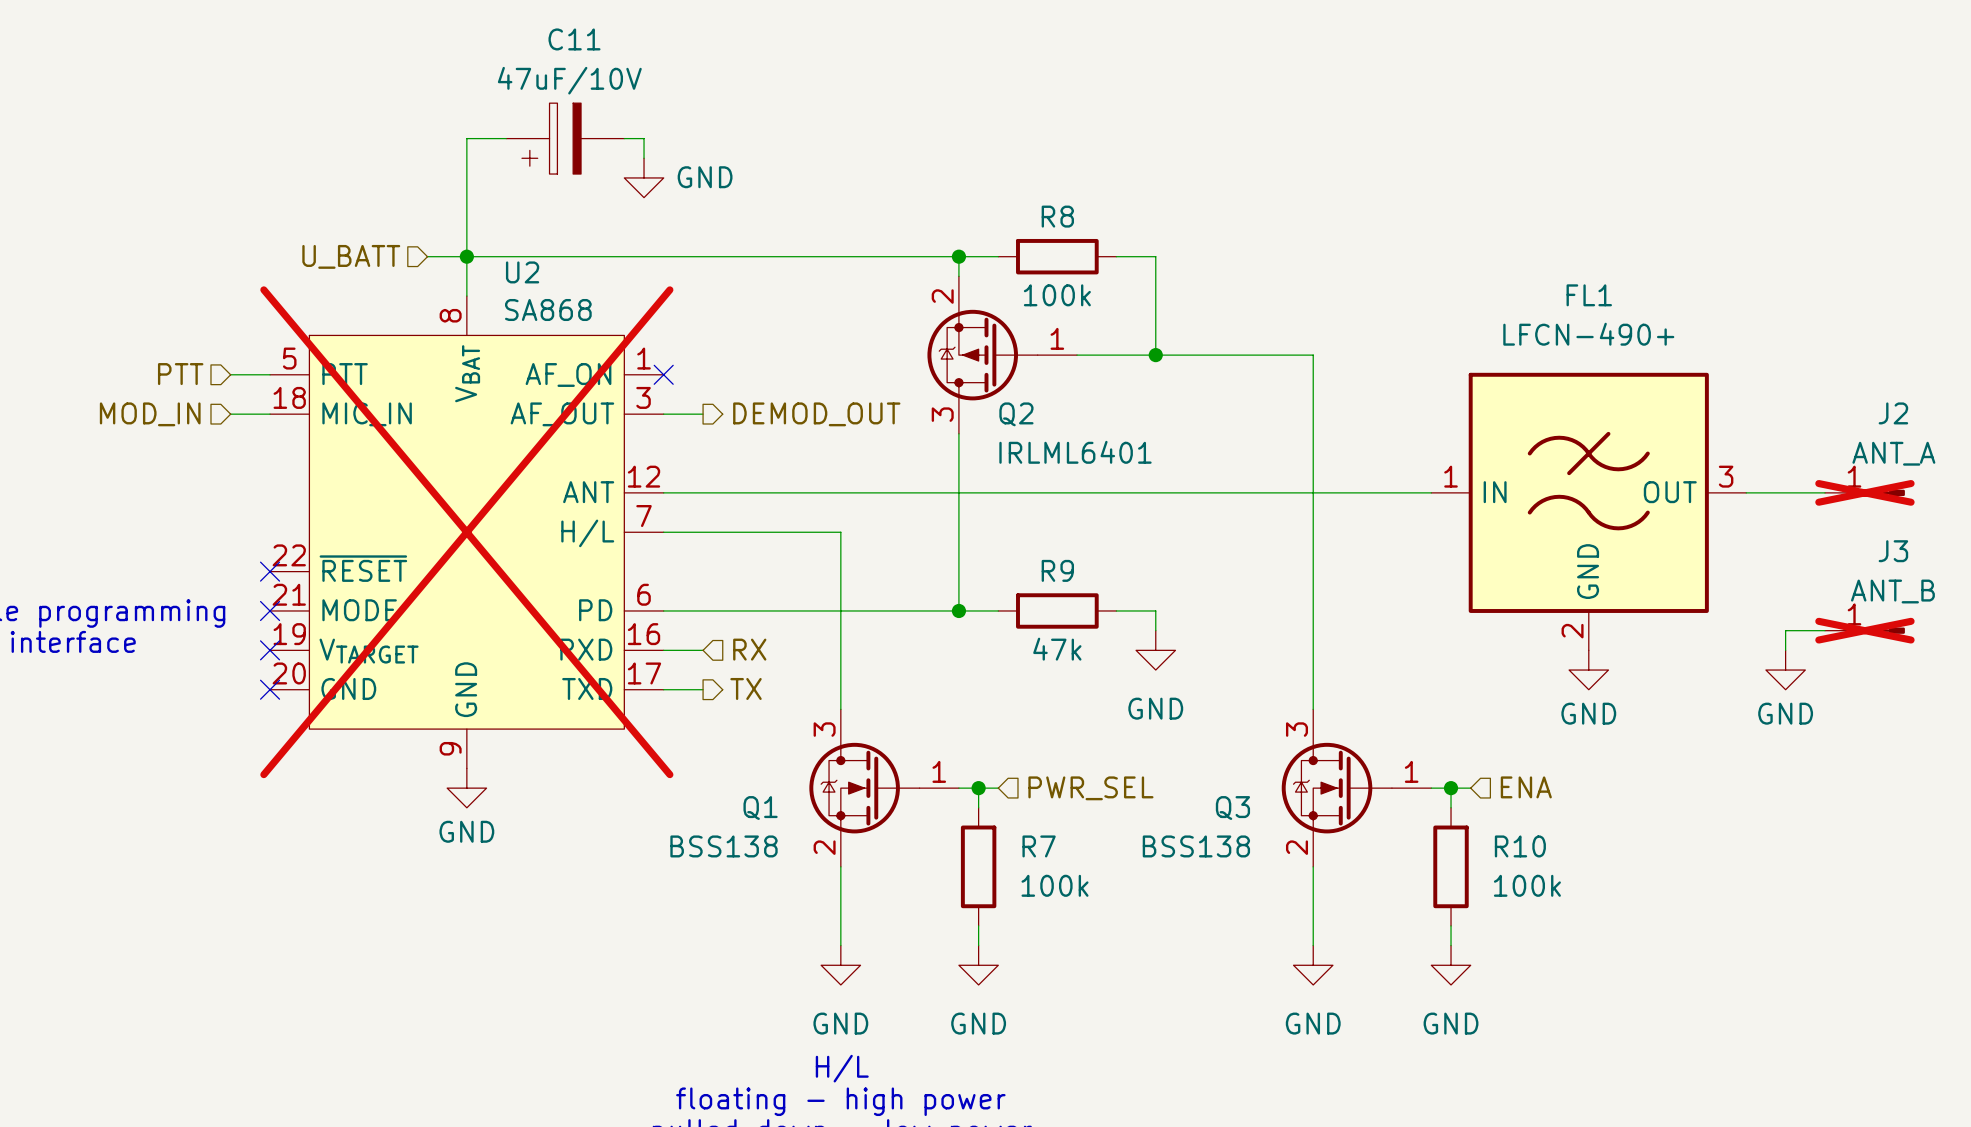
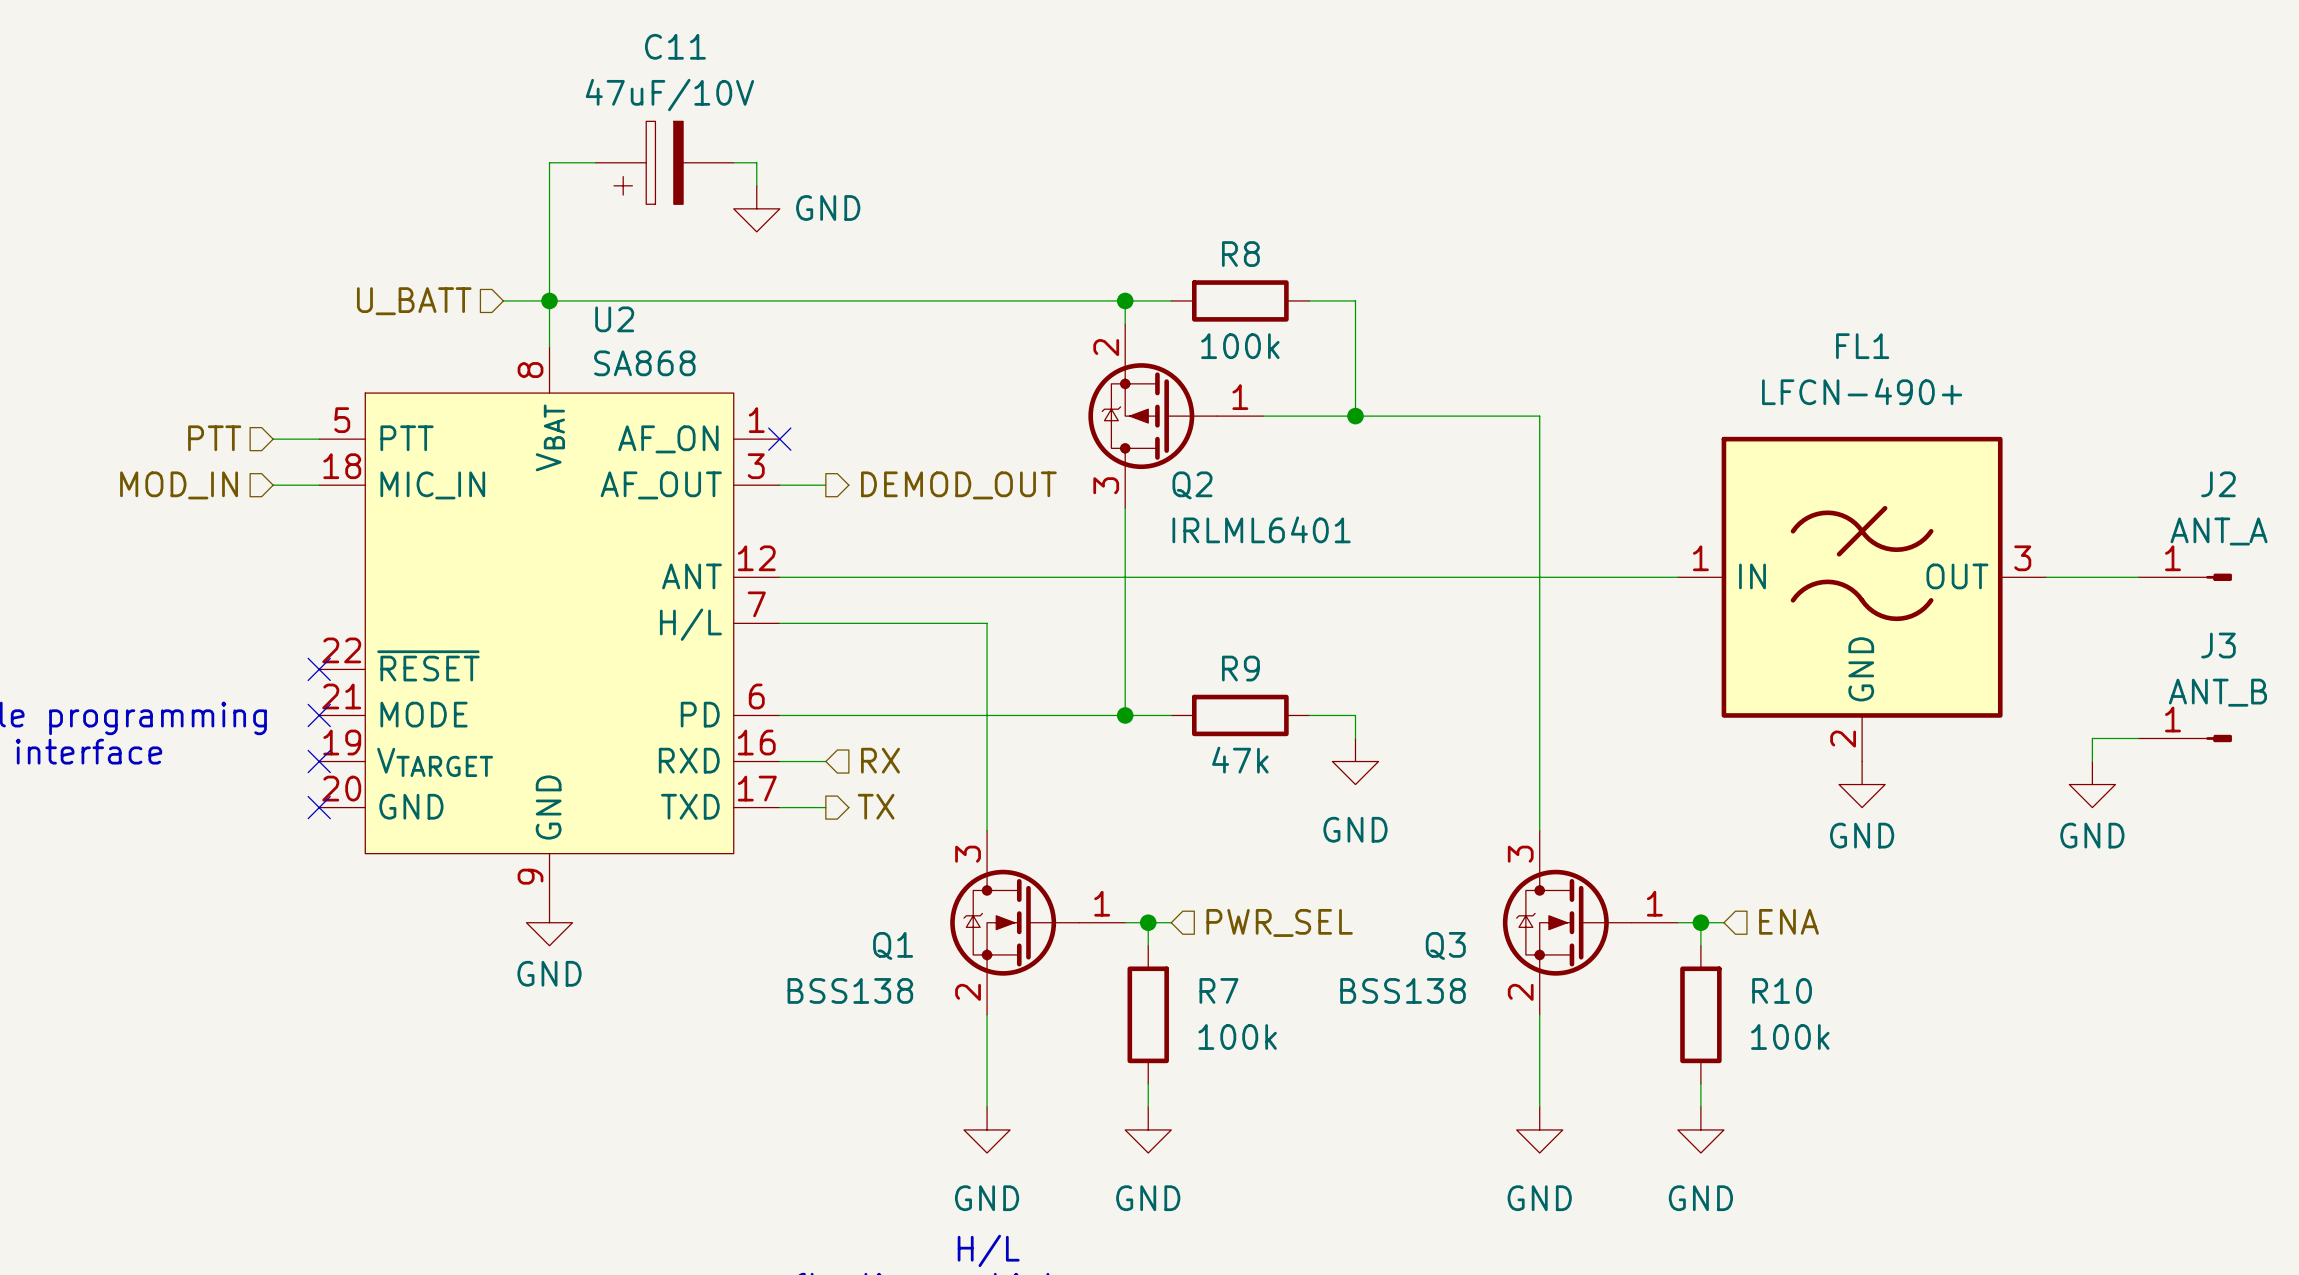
J2 do-not-place cross: (1864, 492) -> none
U2 do-not-place cross: (466, 532) -> none
J3 do-not-place cross: (1864, 630) -> none

